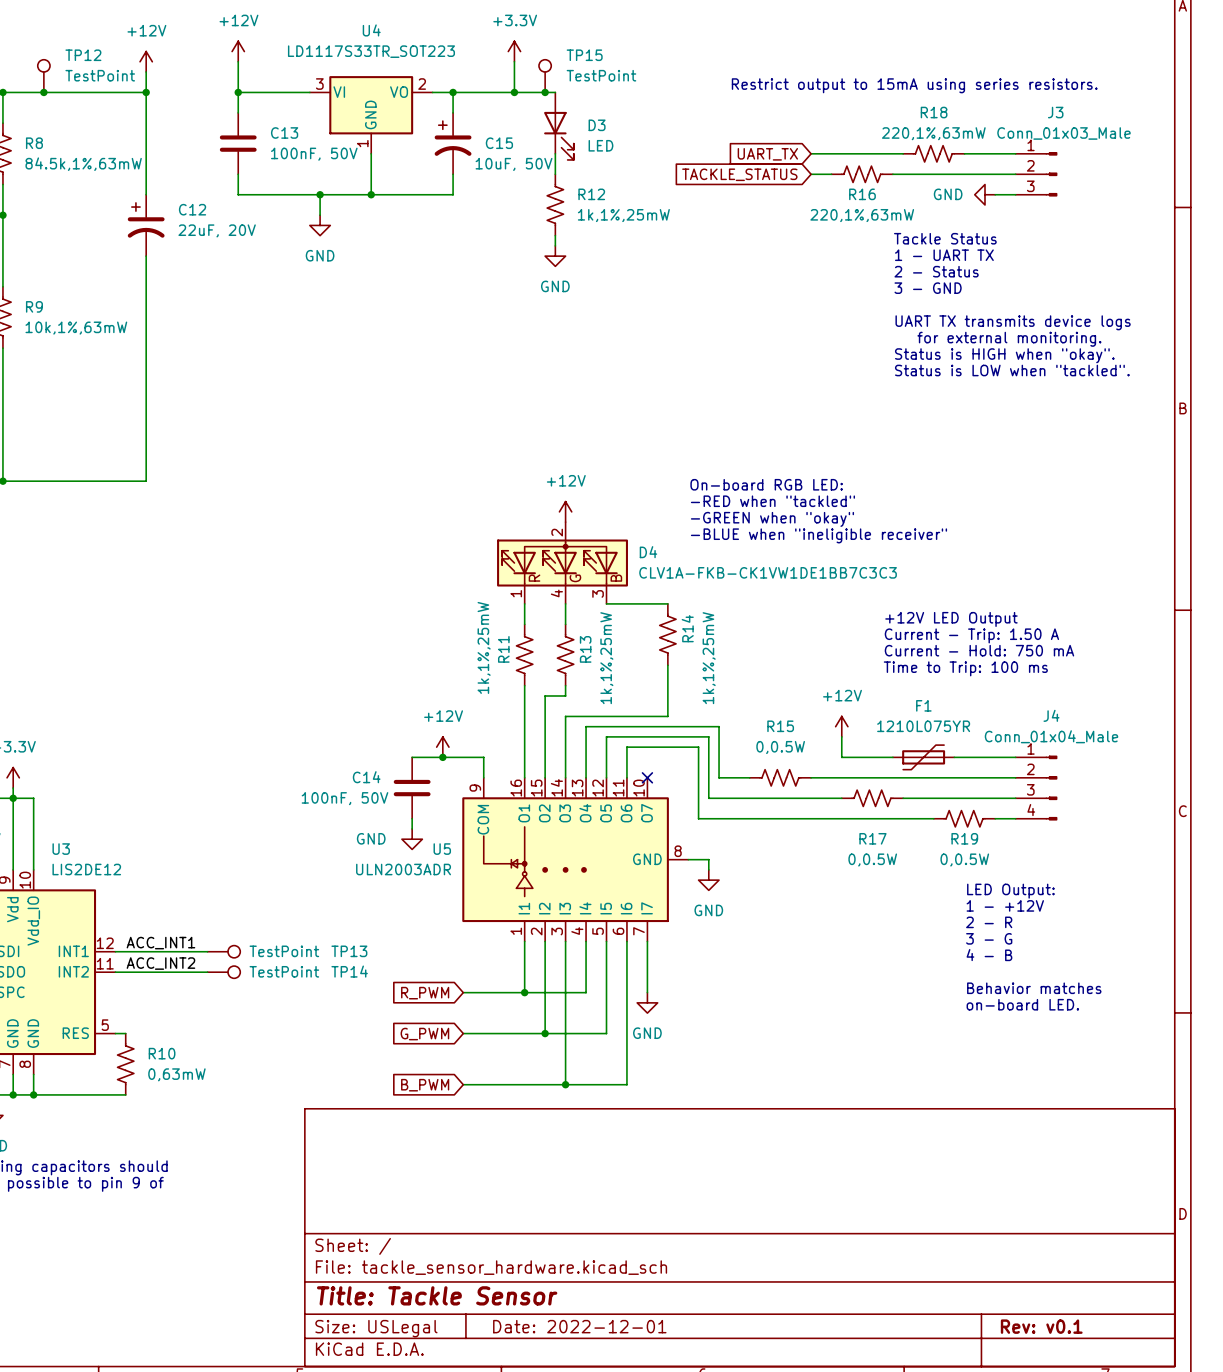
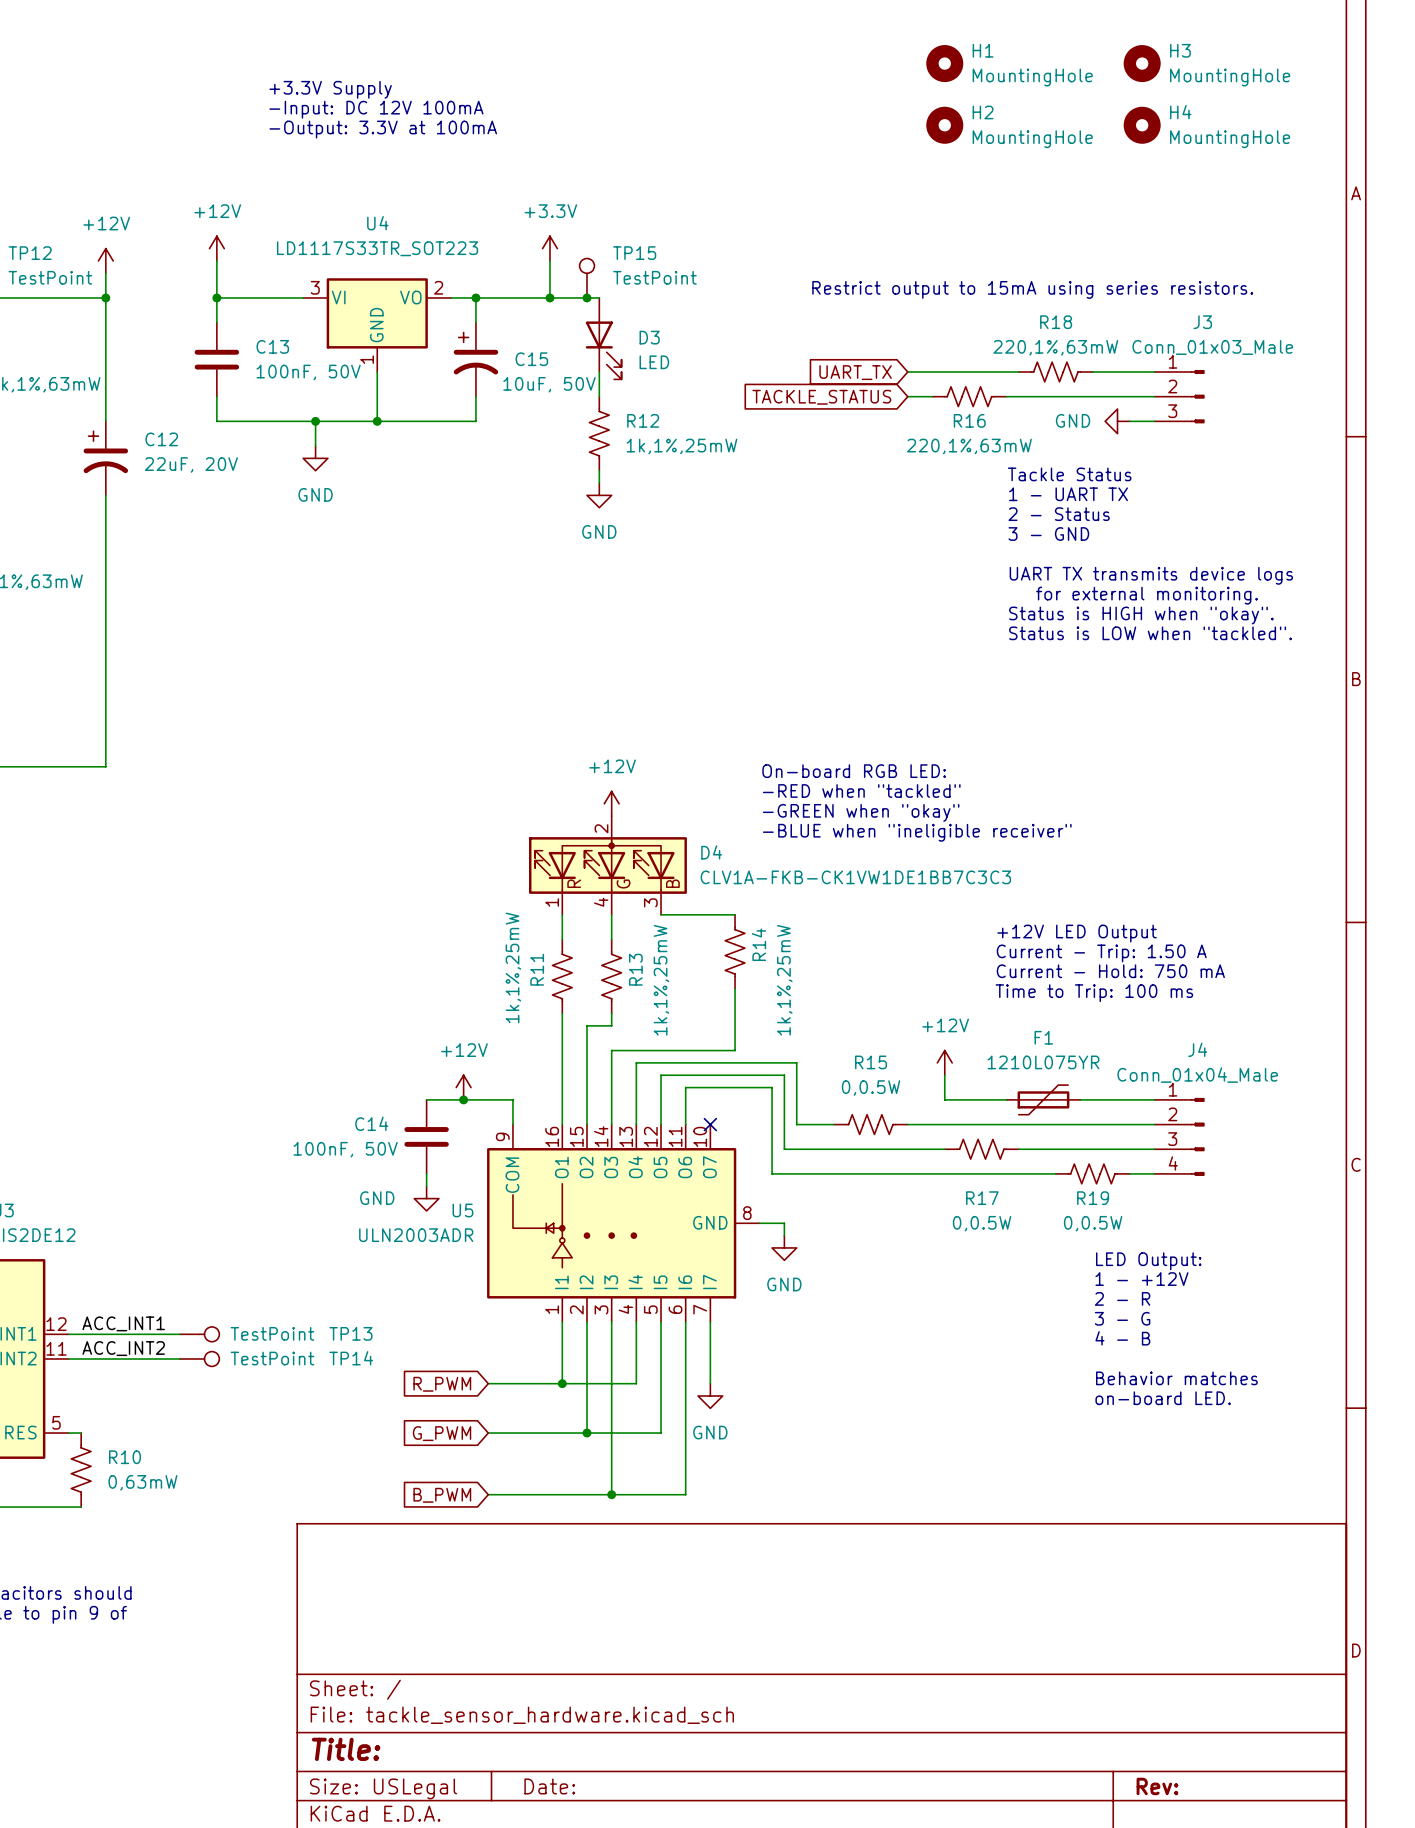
title block: Title: Tackle Sensor (437, 1295) -> Title: (346, 1749)
title block: Date: 2022-12-01 (579, 1326) -> Date: (549, 1786)
title block: Rev: v0.1 (1041, 1326) -> Rev: (1157, 1786)

